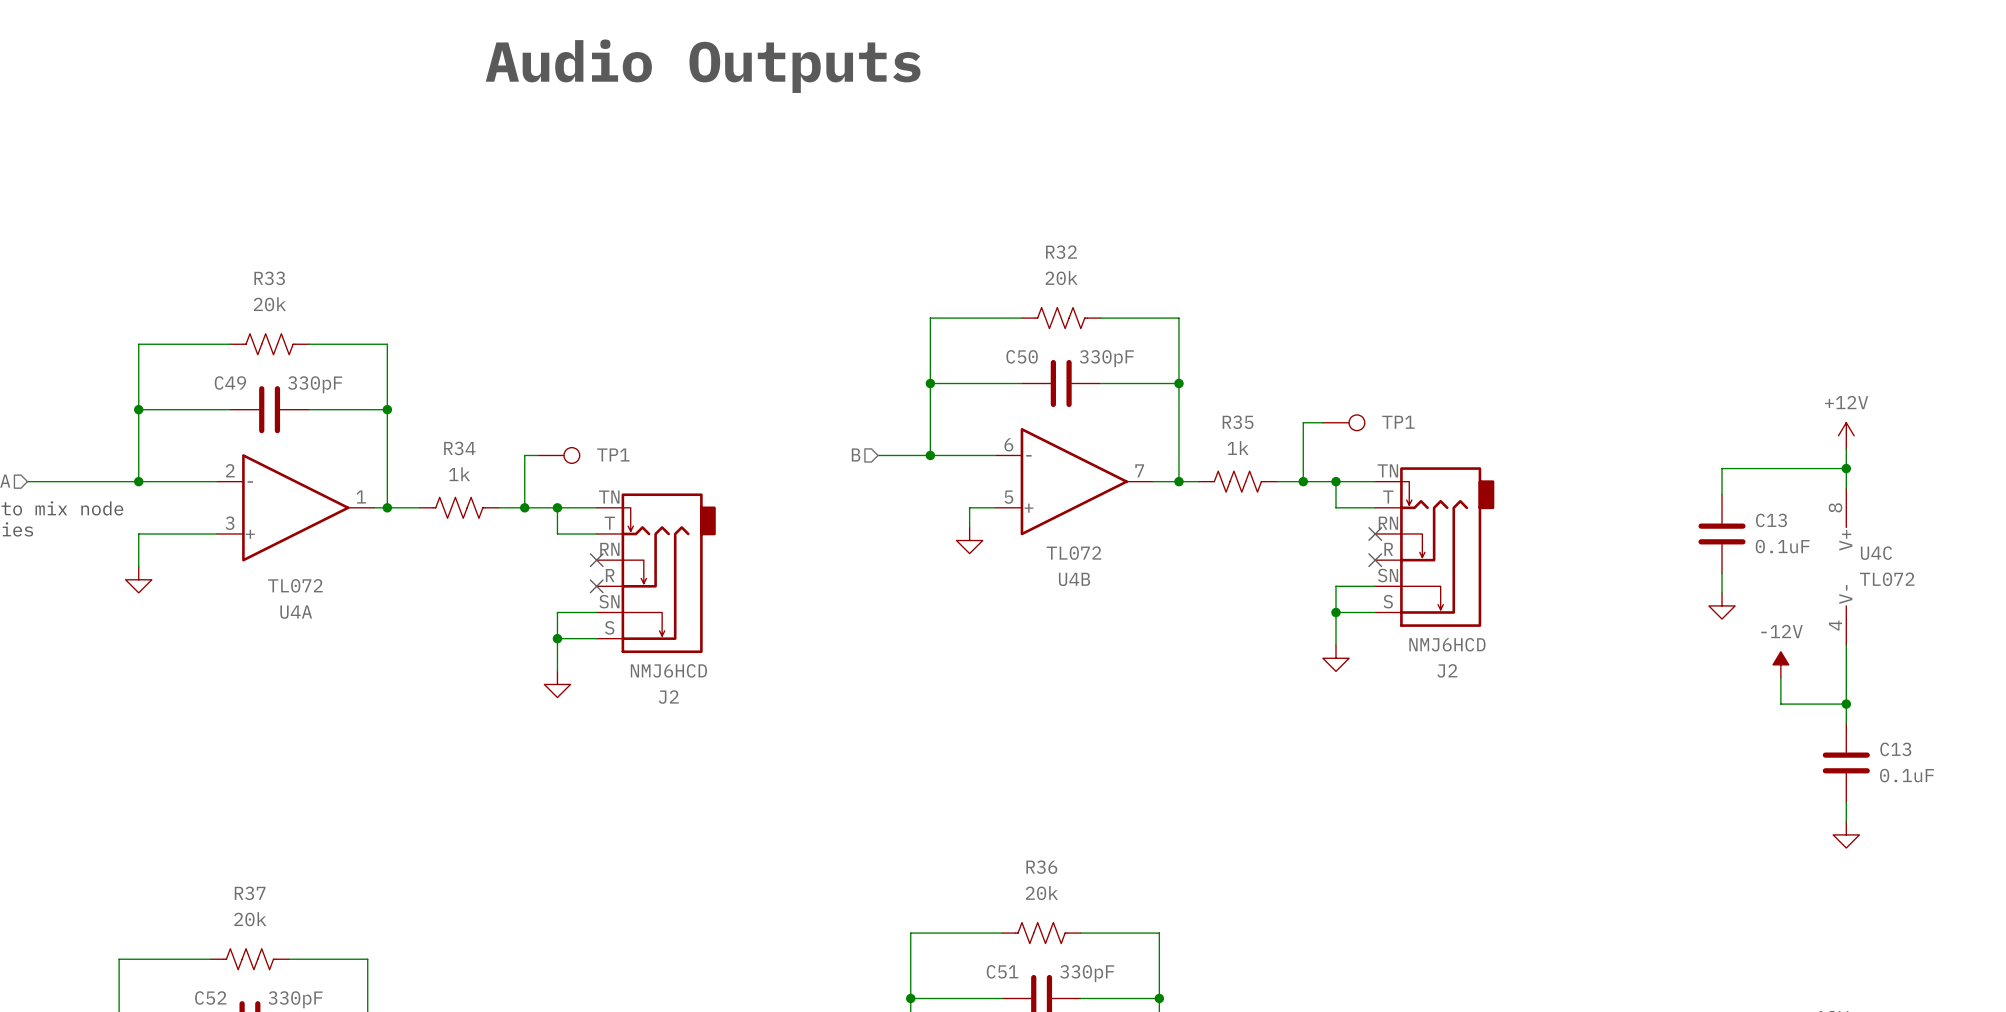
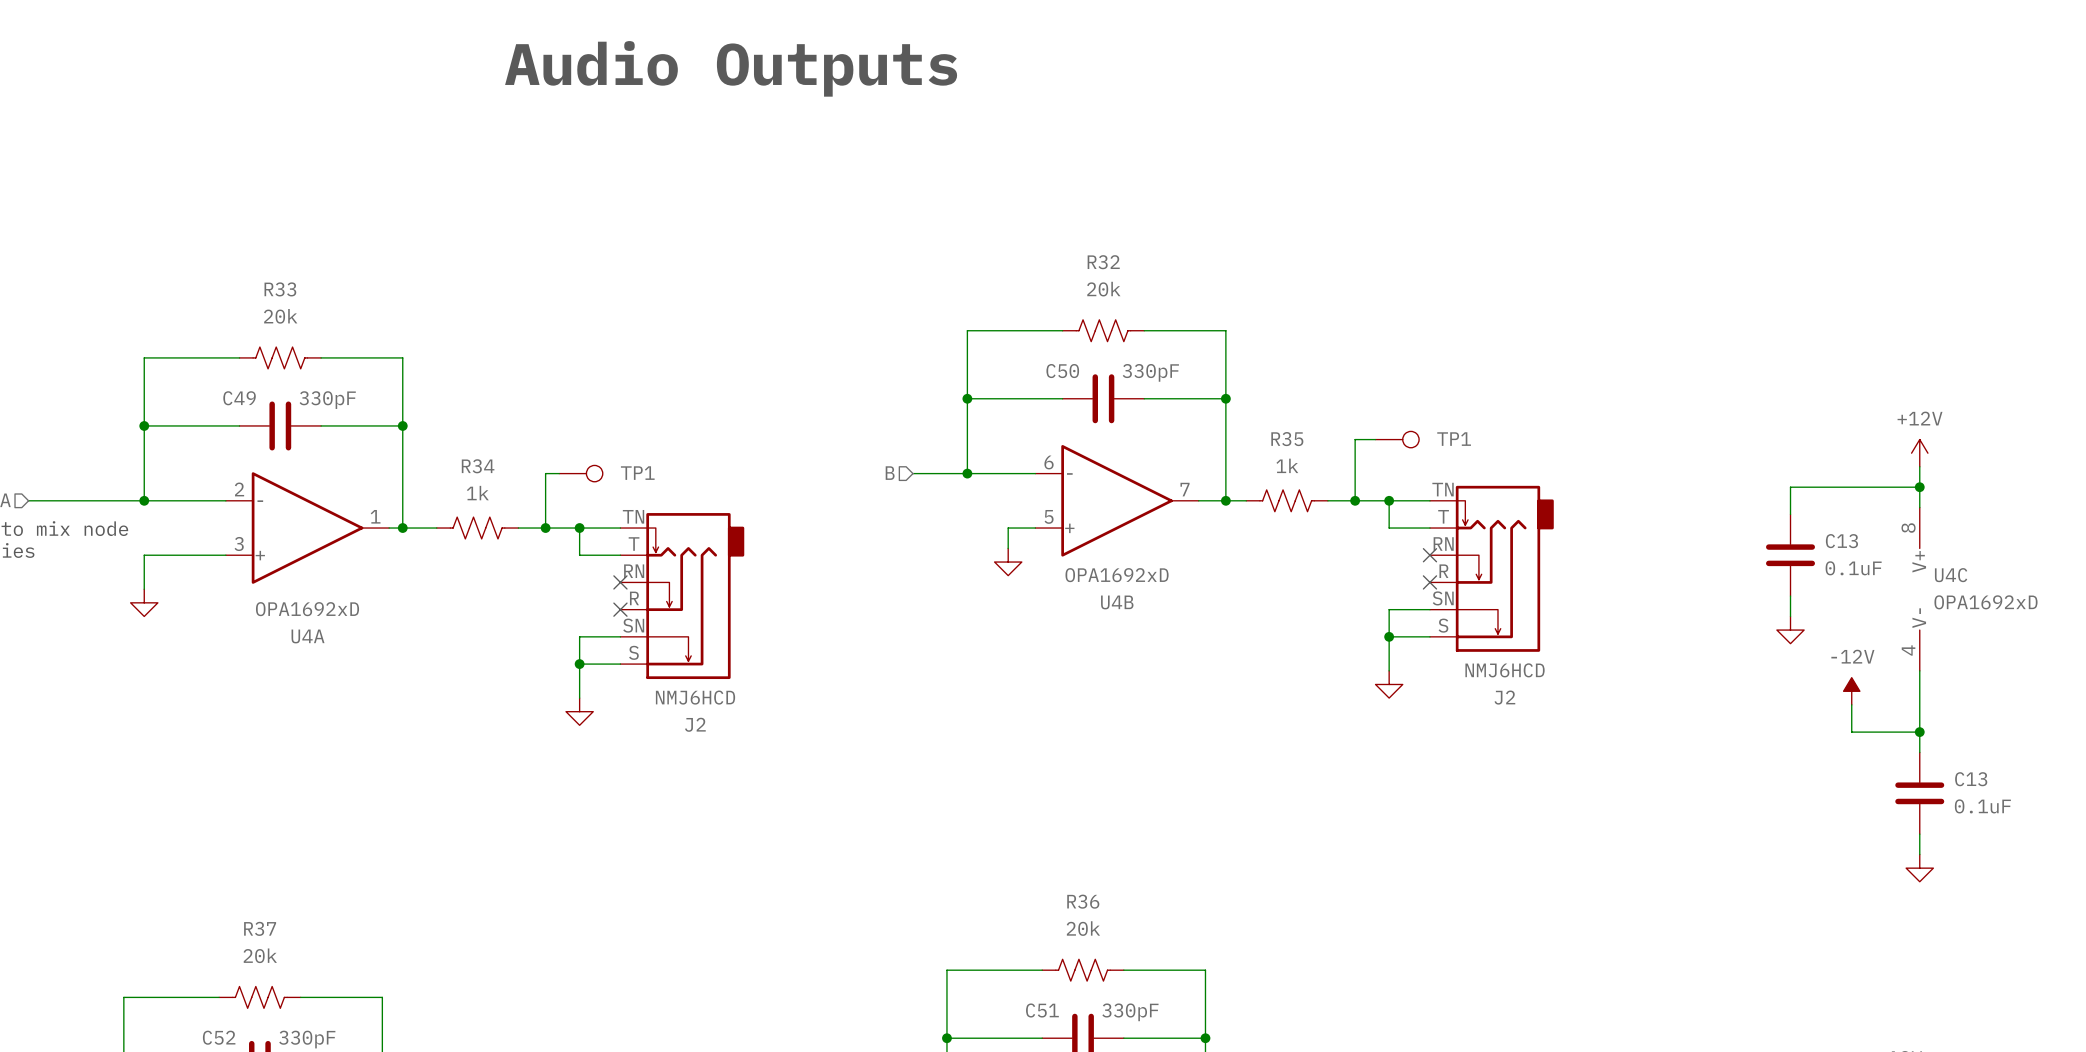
U4B value: TL072 (1073, 553) -> OPA1692xD (1117, 575)
U4C value: TL072 (1887, 579) -> OPA1692xD (1985, 602)
U4A value: TL072 (295, 585) -> OPA1692xD (307, 609)

